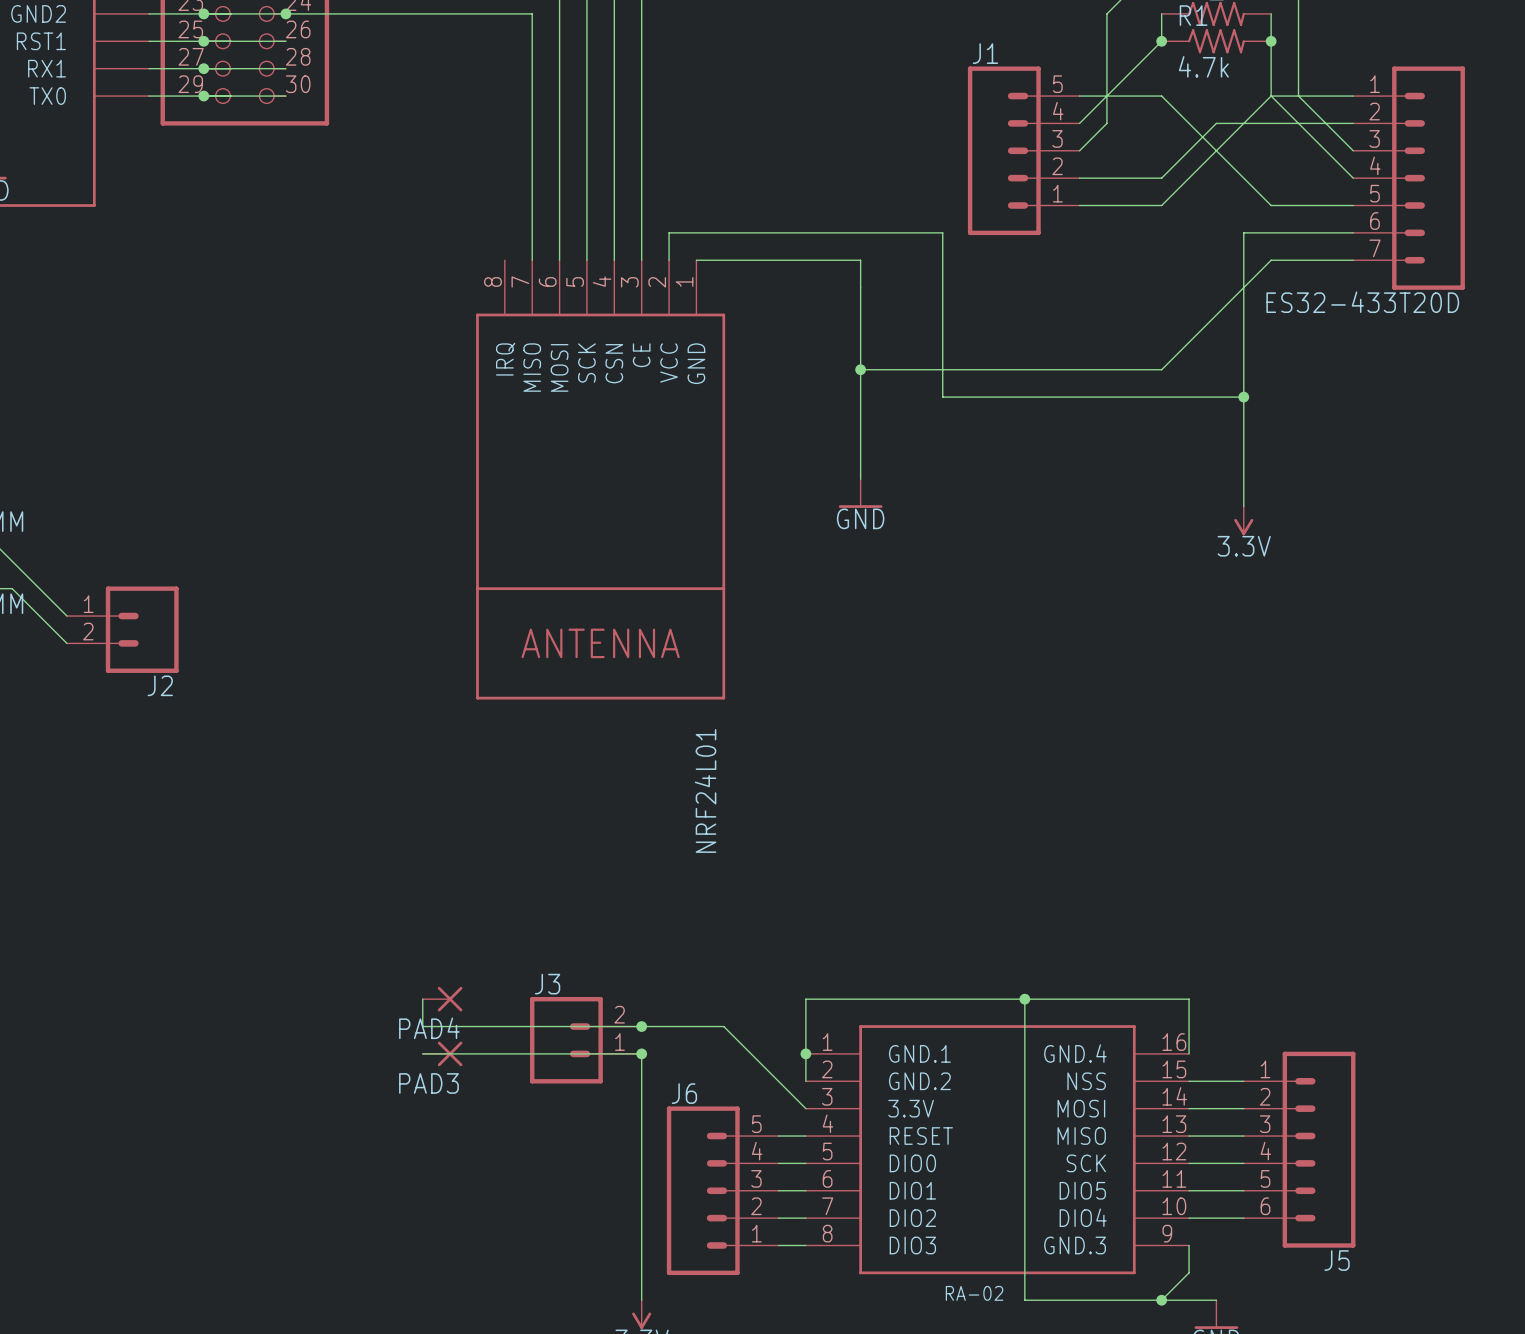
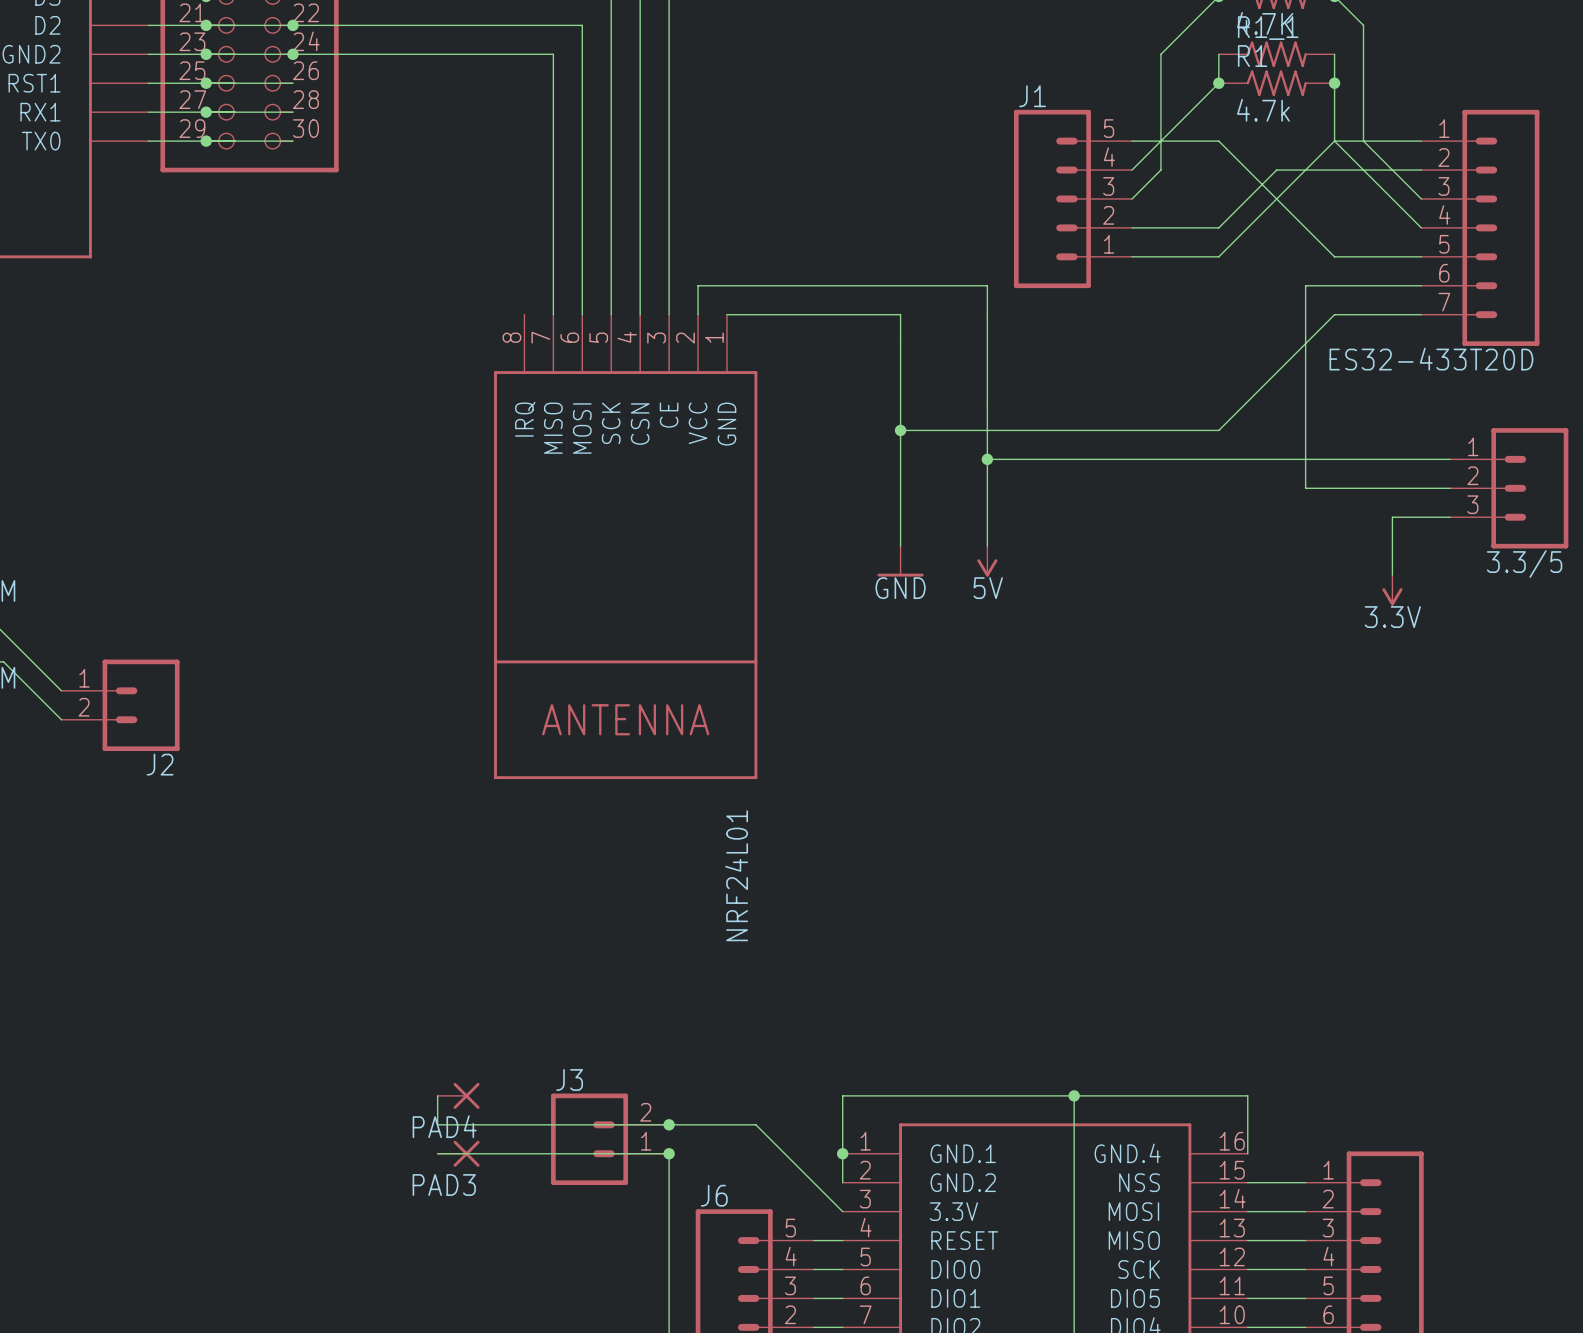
wire: none -> (987, 459) (987, 546)
junction: none -> (987, 459)
wire: none -> (1305, 459) (1450, 459)
junction: (1243, 397) -> none
wire: (1243, 424) (1243, 506) -> (1305, 488) (1450, 488)
3.3/5: none -> (1509, 488)
wire: none -> (1450, 517) (1392, 517) (1392, 575)
power symbol: none -> 5V (987, 561)
power symbol position: 3.3V (1243, 520) -> 3.3V (1392, 590)

